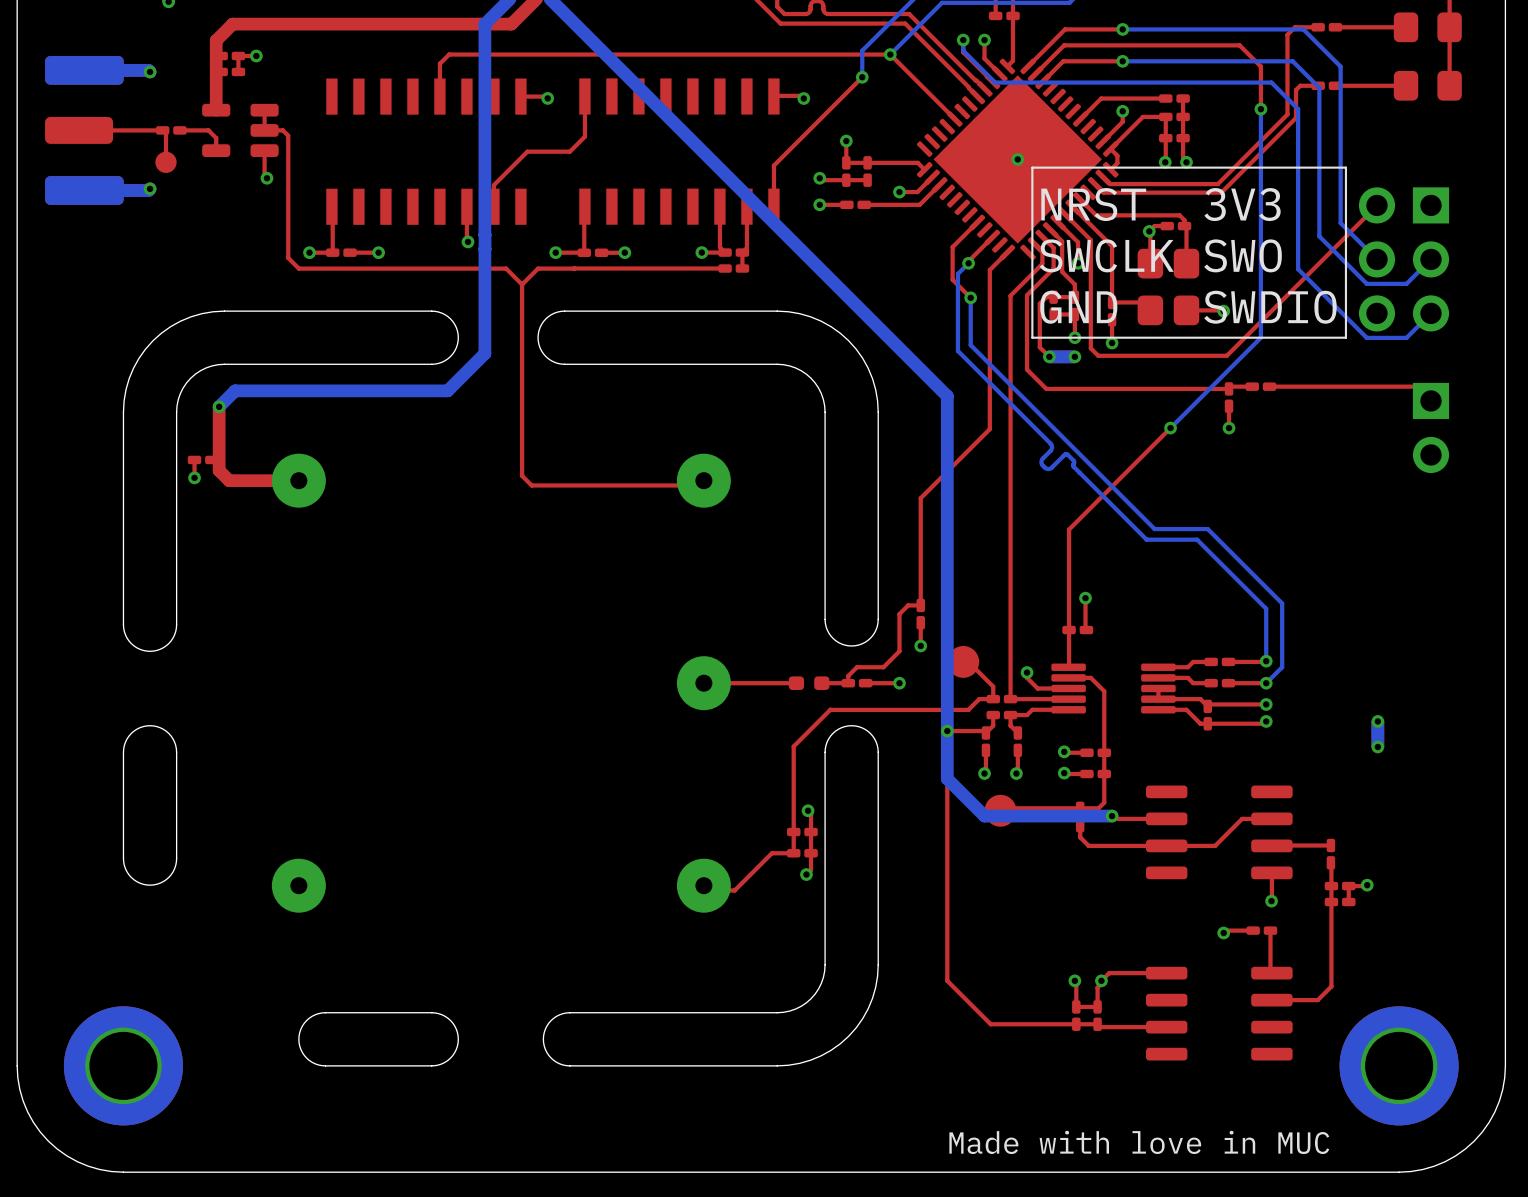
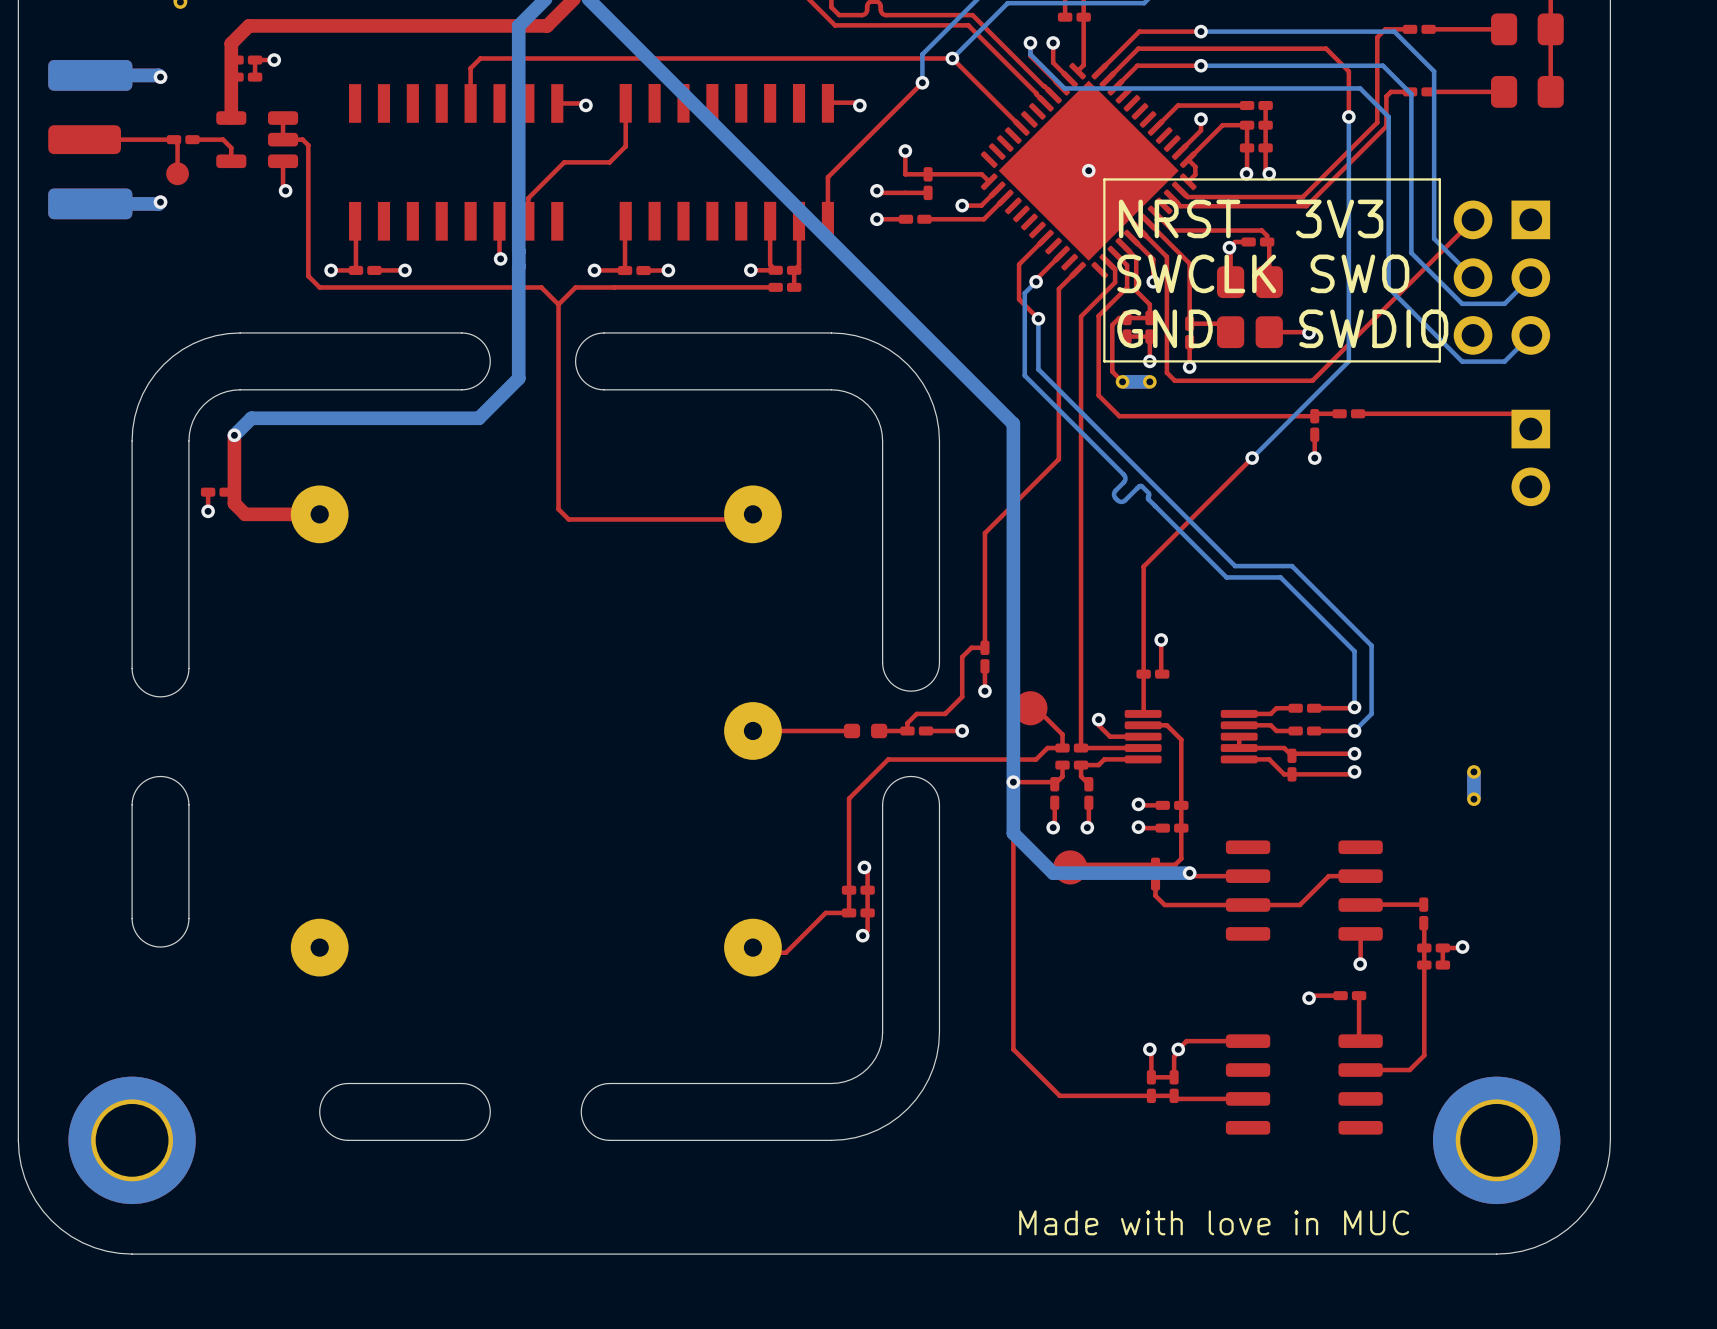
part: (846, 171) -> none

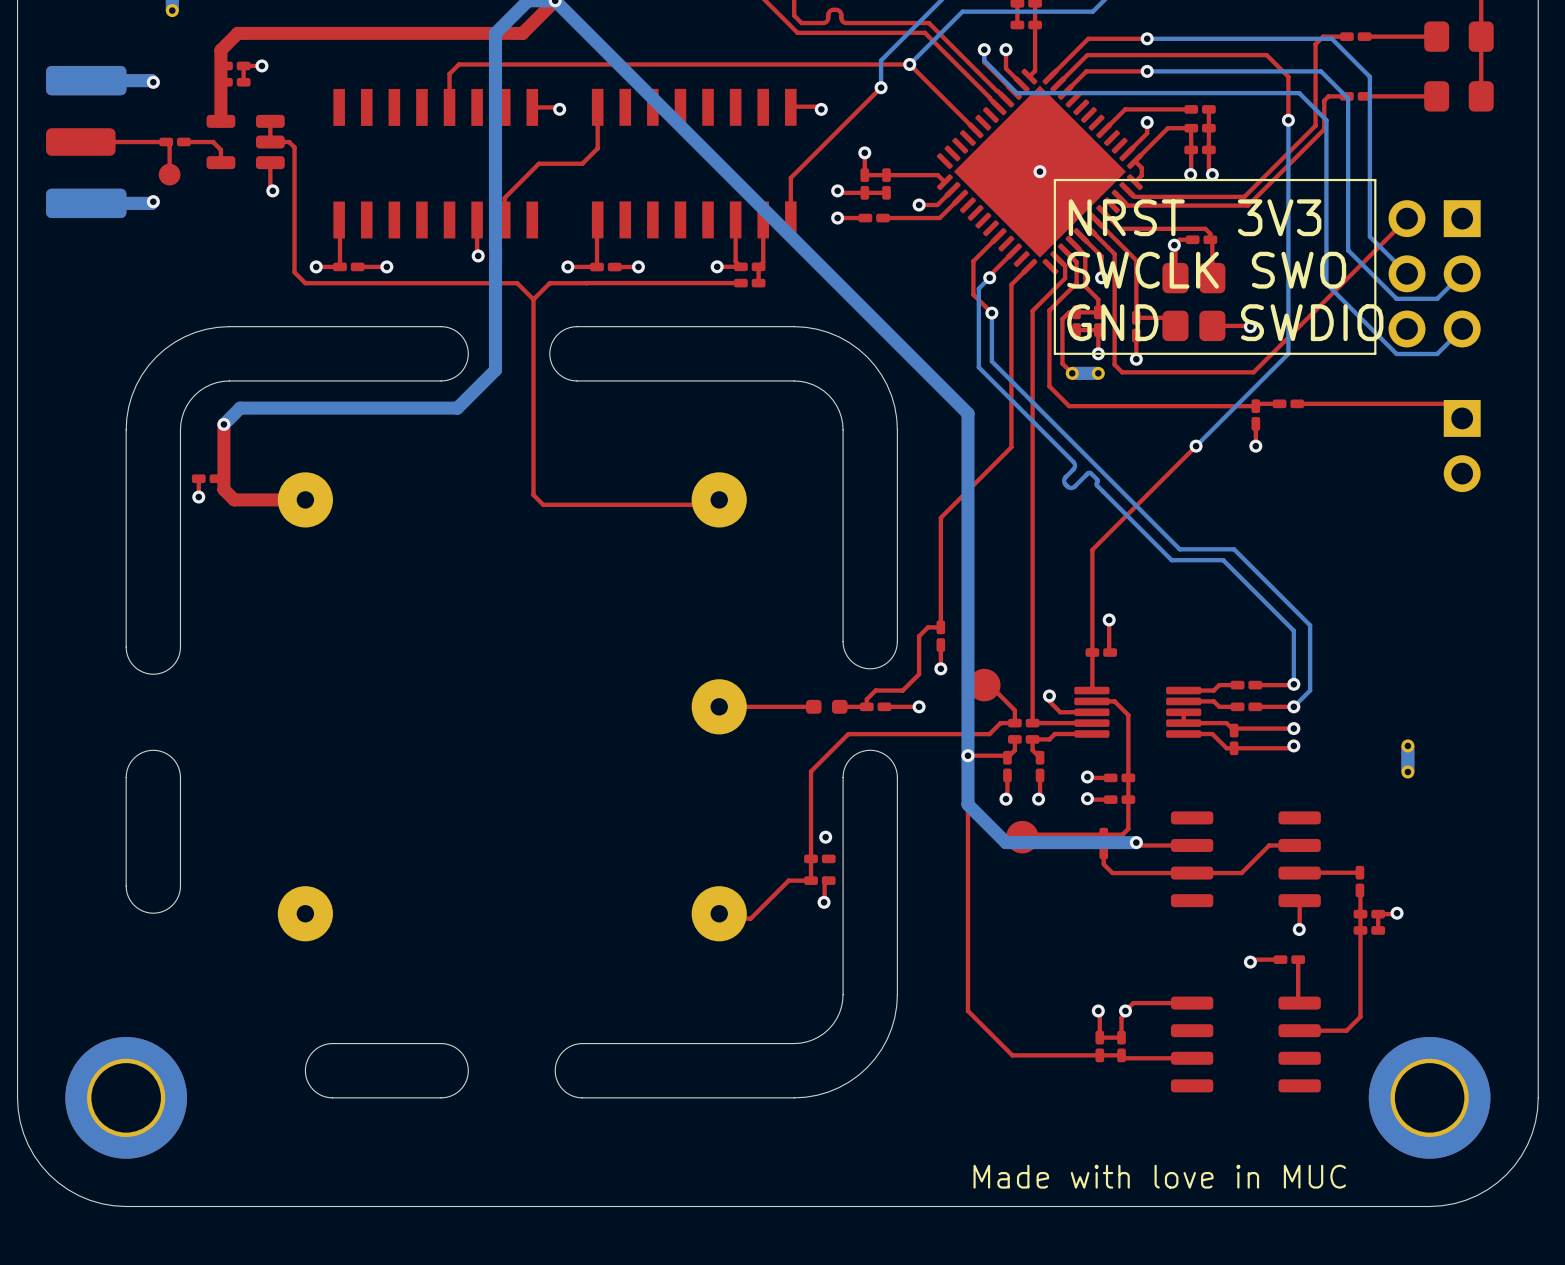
part: none -> (864, 183)
top track: (864, 867) (867, 870) (867, 930) (863, 935) -> (824, 878) (824, 901)

